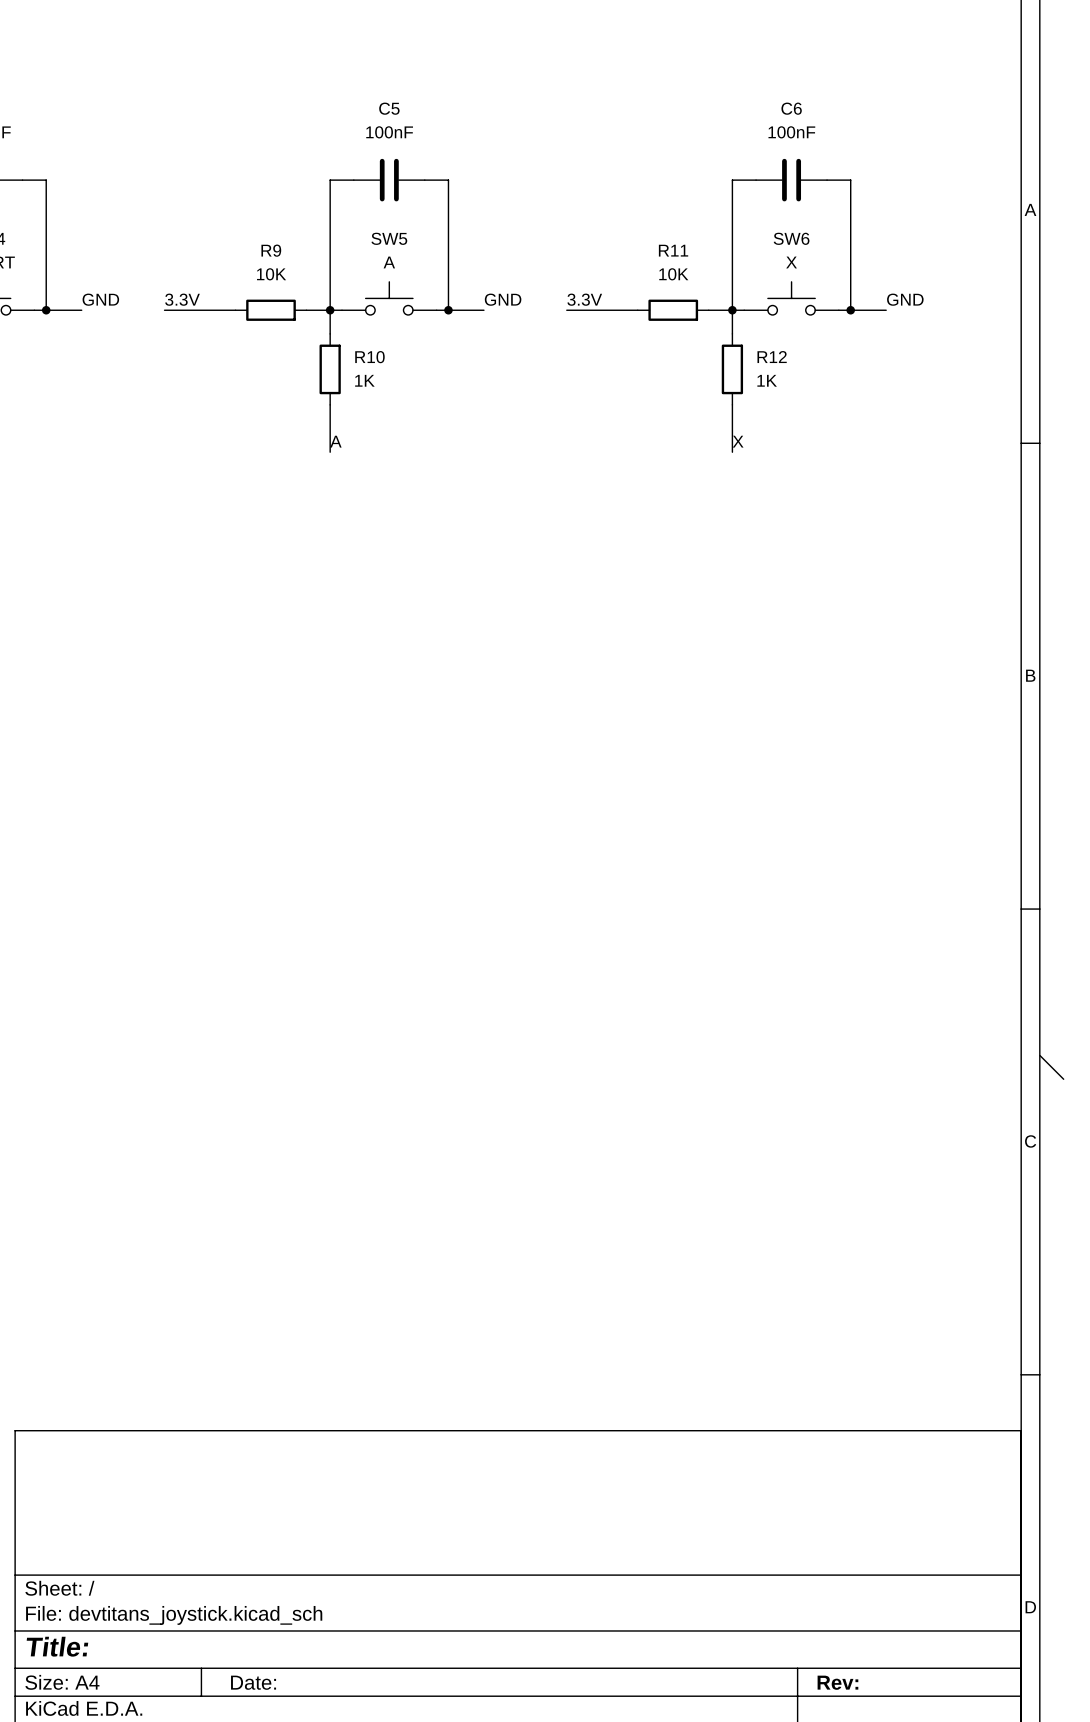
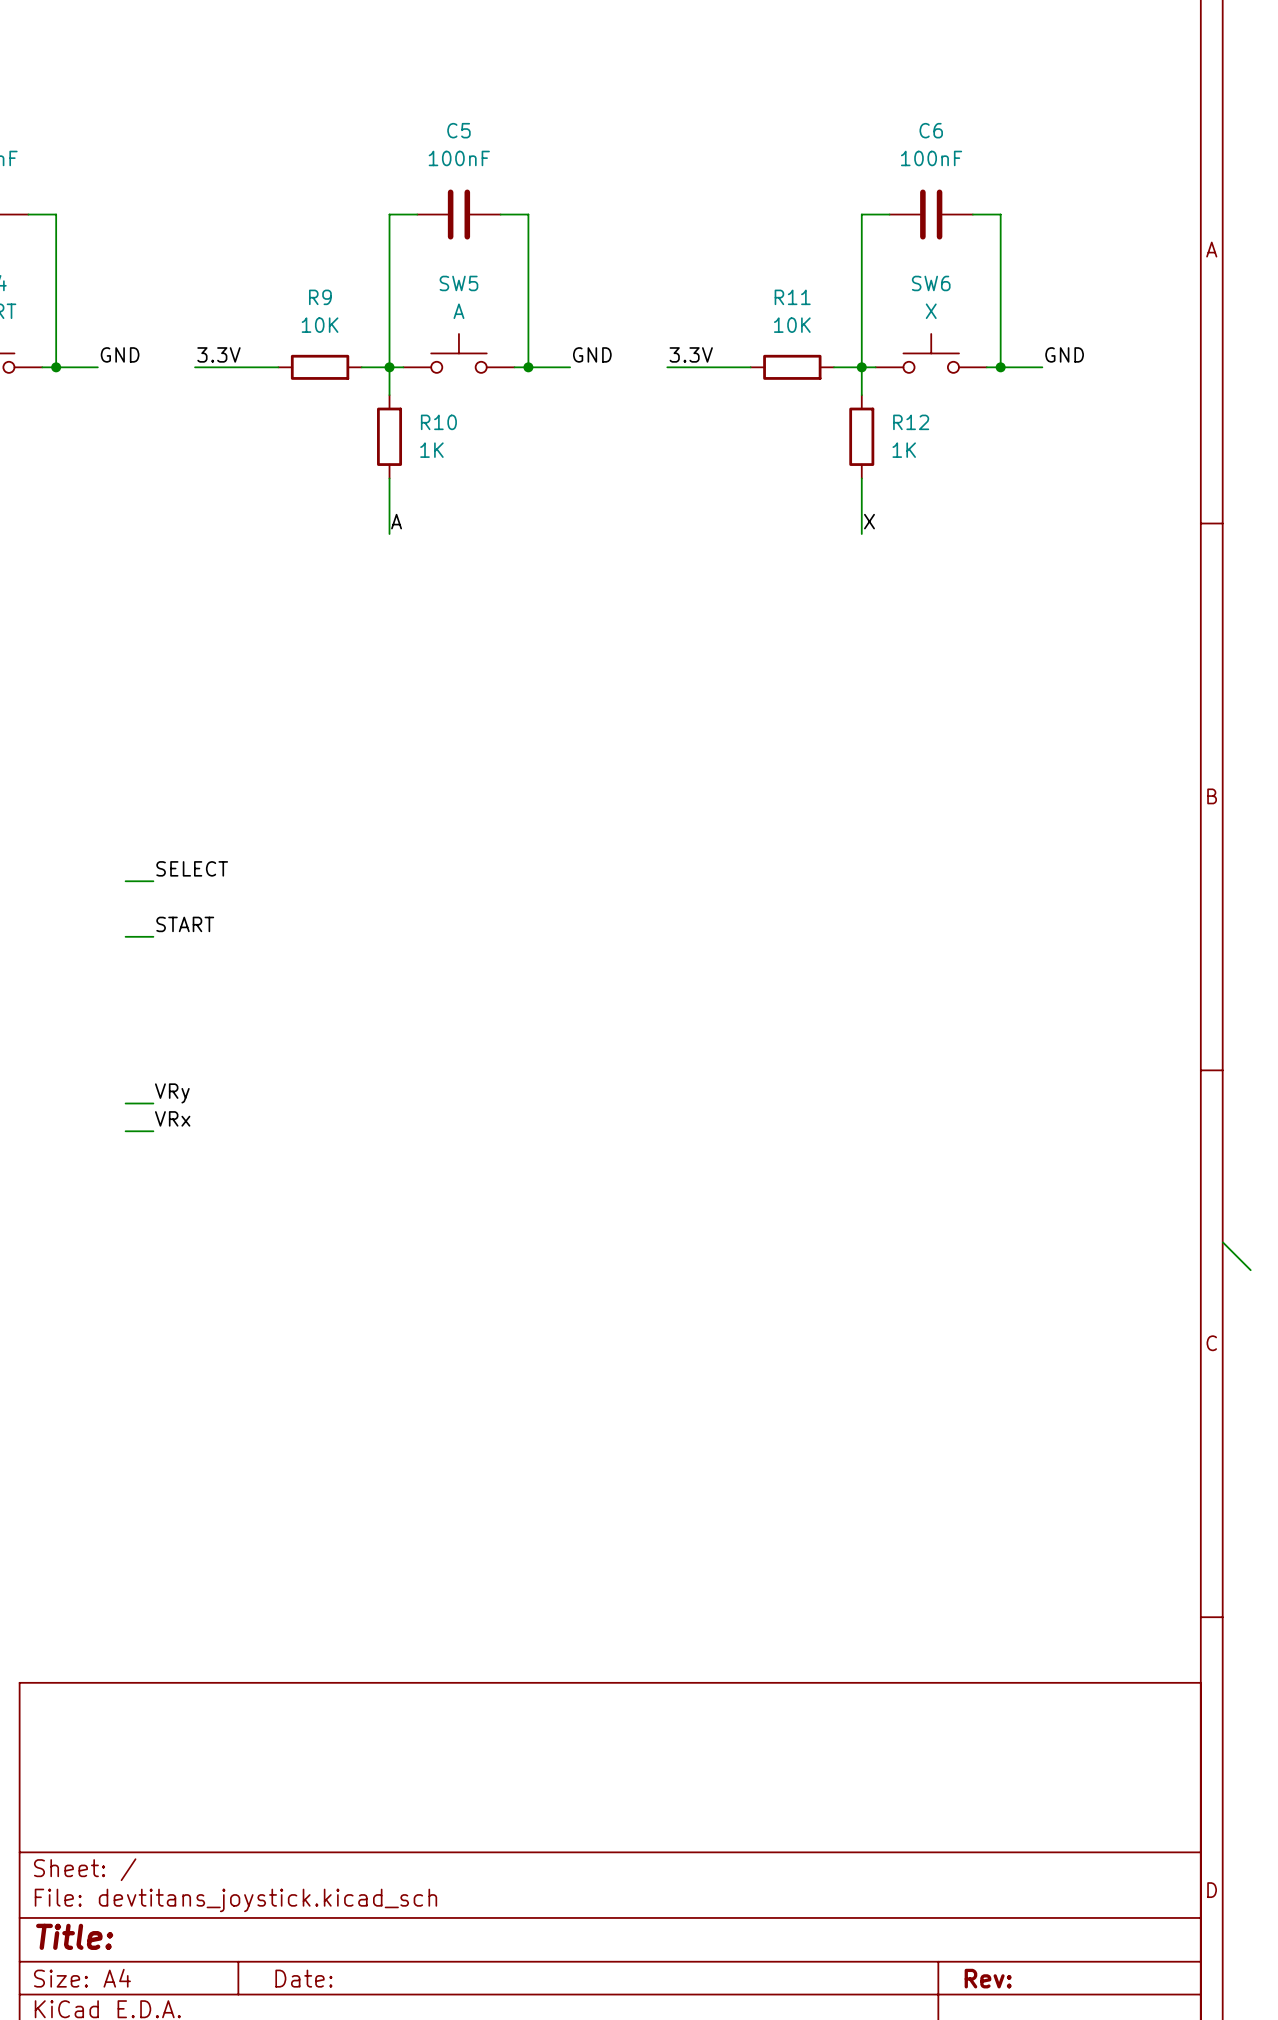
label: none -> SELECT (192, 868)
wire: none -> (125, 881) (153, 881)
label: none -> START (185, 924)
wire: none -> (125, 936) (153, 936)
label: none -> VRy (172, 1093)
wire: none -> (125, 1103) (153, 1103)
label: none -> VRx (172, 1118)
wire: none -> (125, 1131) (153, 1131)

